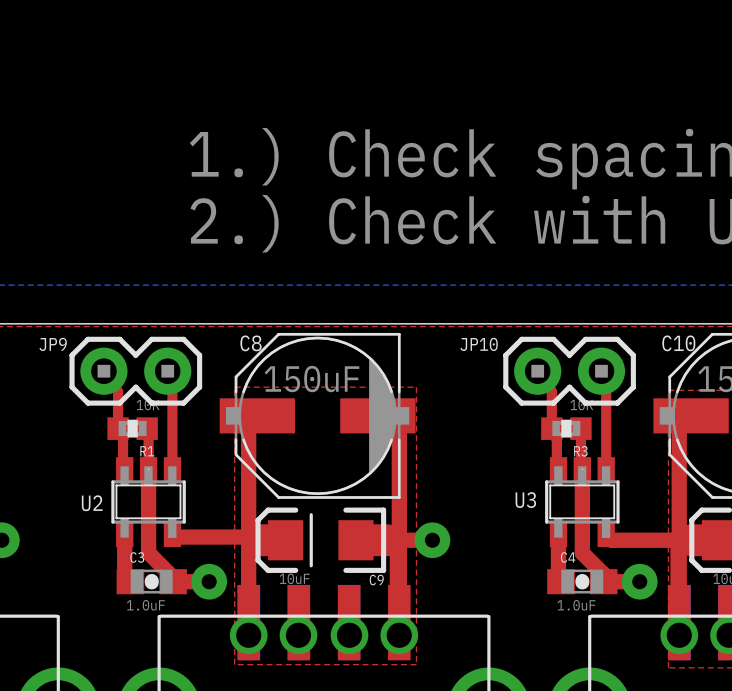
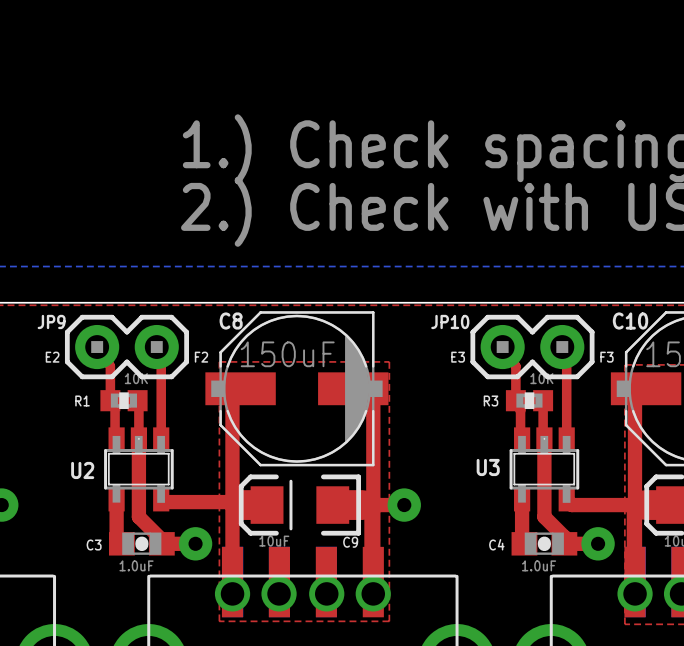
text: none -> E2 (52, 357)
text: none -> F2 (201, 357)
text: none -> E3 (458, 357)
text: none -> F3 (606, 357)
R1 name position: R1 (147, 451) -> R1 (82, 400)
R3 name position: R3 (580, 451) -> R3 (491, 400)
C3 name position: C3 (137, 557) -> C3 (94, 545)
C4 name position: C4 (568, 557) -> C4 (496, 544)

